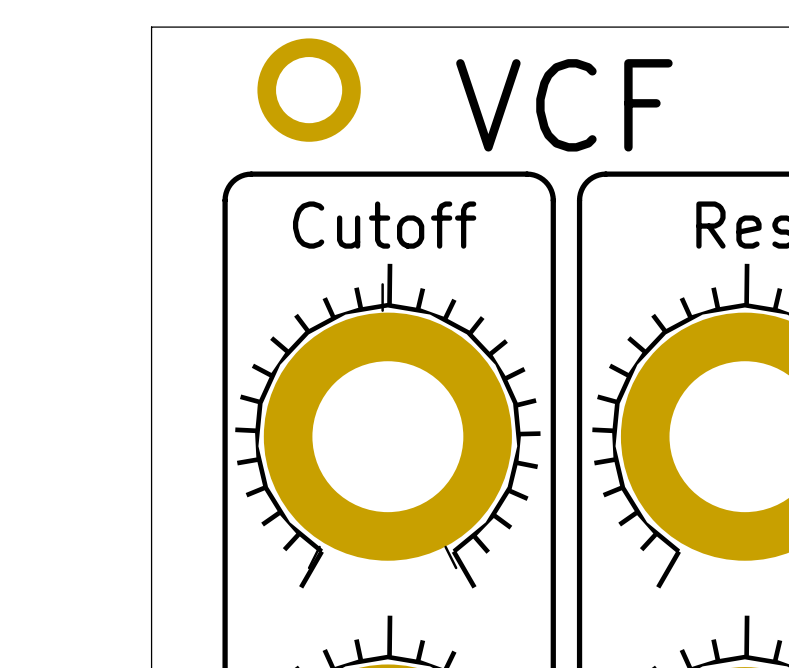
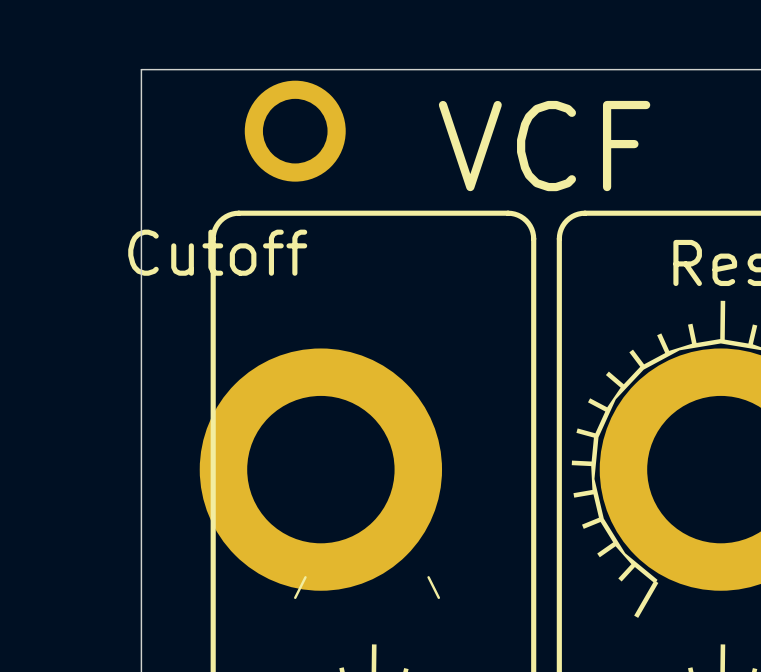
text position: Cutoff (384, 225) -> Cutoff (217, 252)
drawing: [235, 263, 541, 589] -> none
line: (382, 284) (382, 310) -> none
part position: (387, 436) -> (320, 469)

